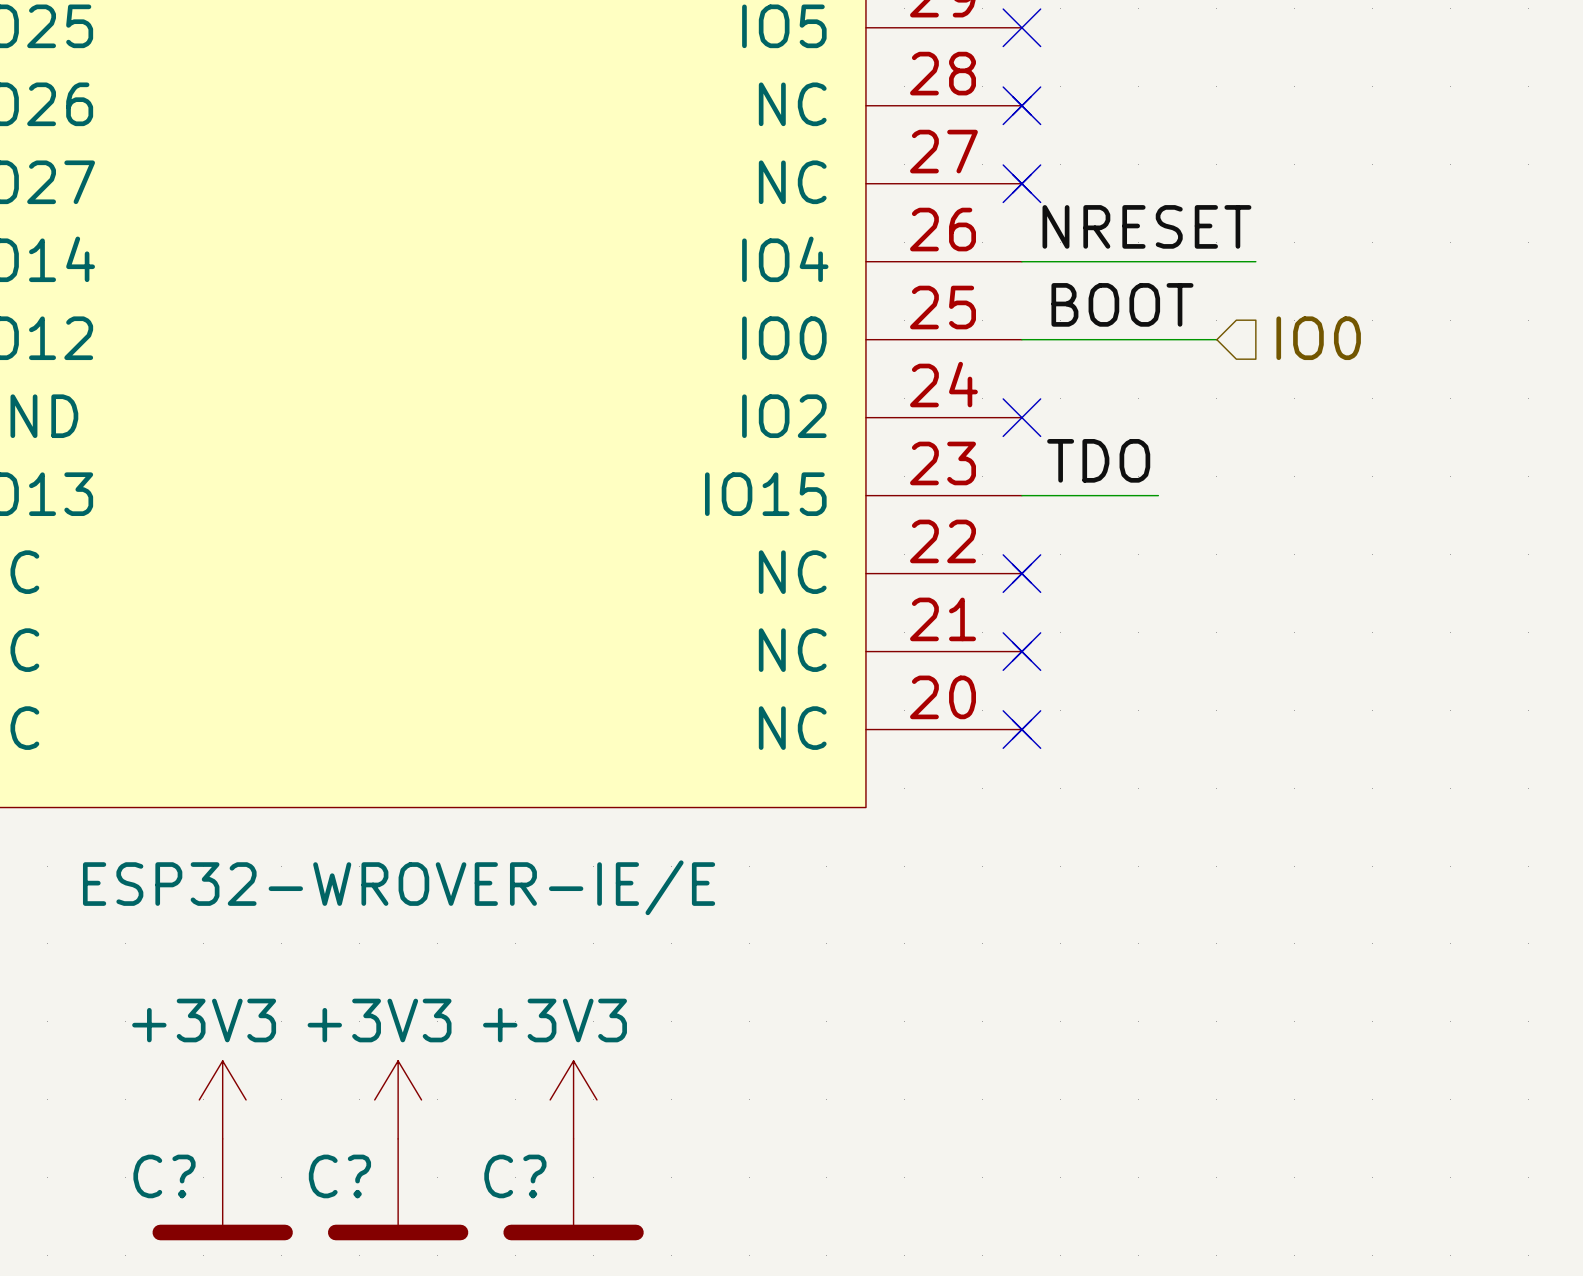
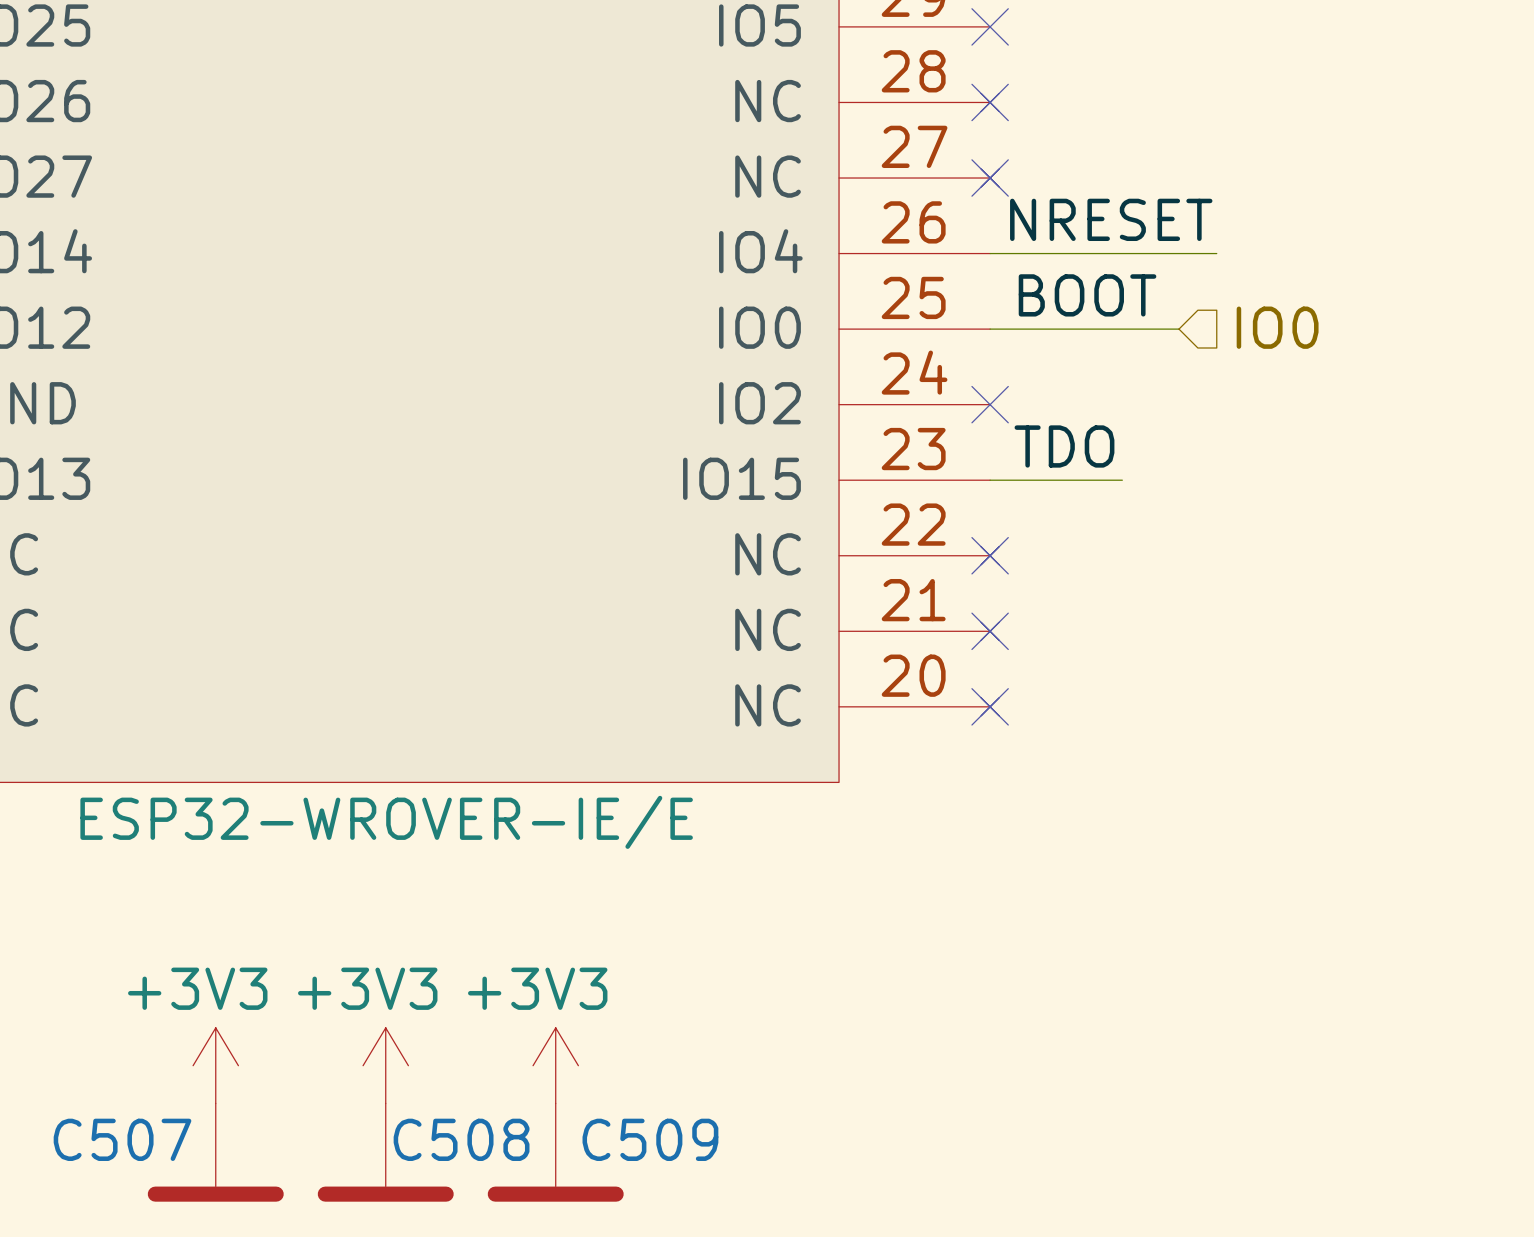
part value position: ESP32-WROVER-IE/E (399, 887) -> ESP32-WROVER-IE/E (386, 822)
C? name: C? (164, 1176) -> C507 (122, 1139)
C? name: C? (339, 1176) -> C508 (461, 1139)
C? name: C? (515, 1176) -> C509 (650, 1139)

